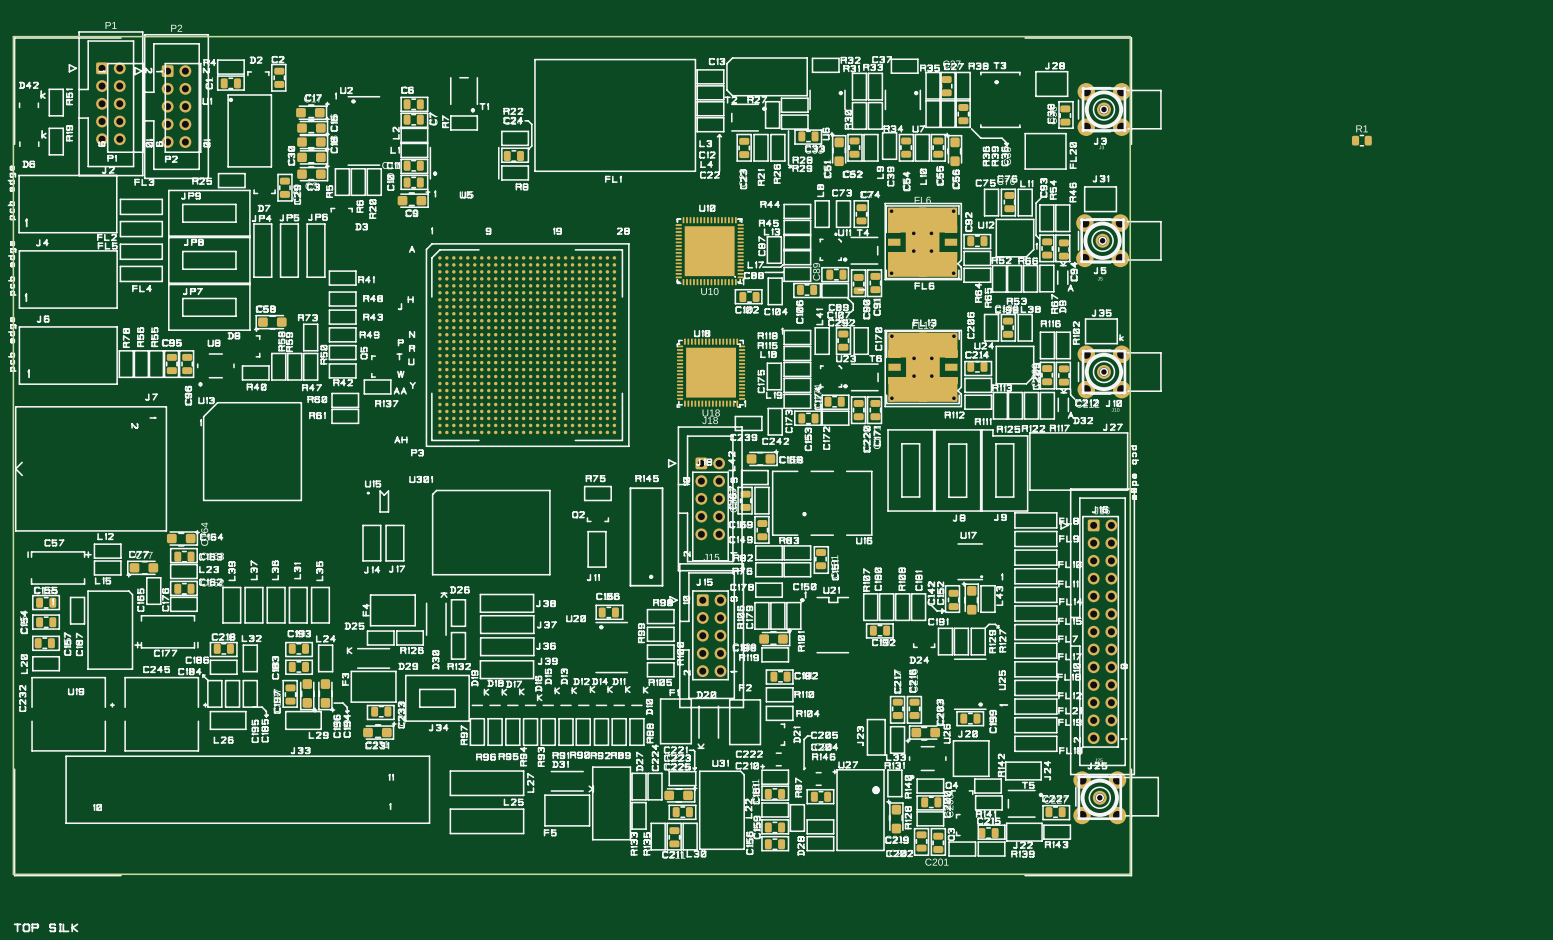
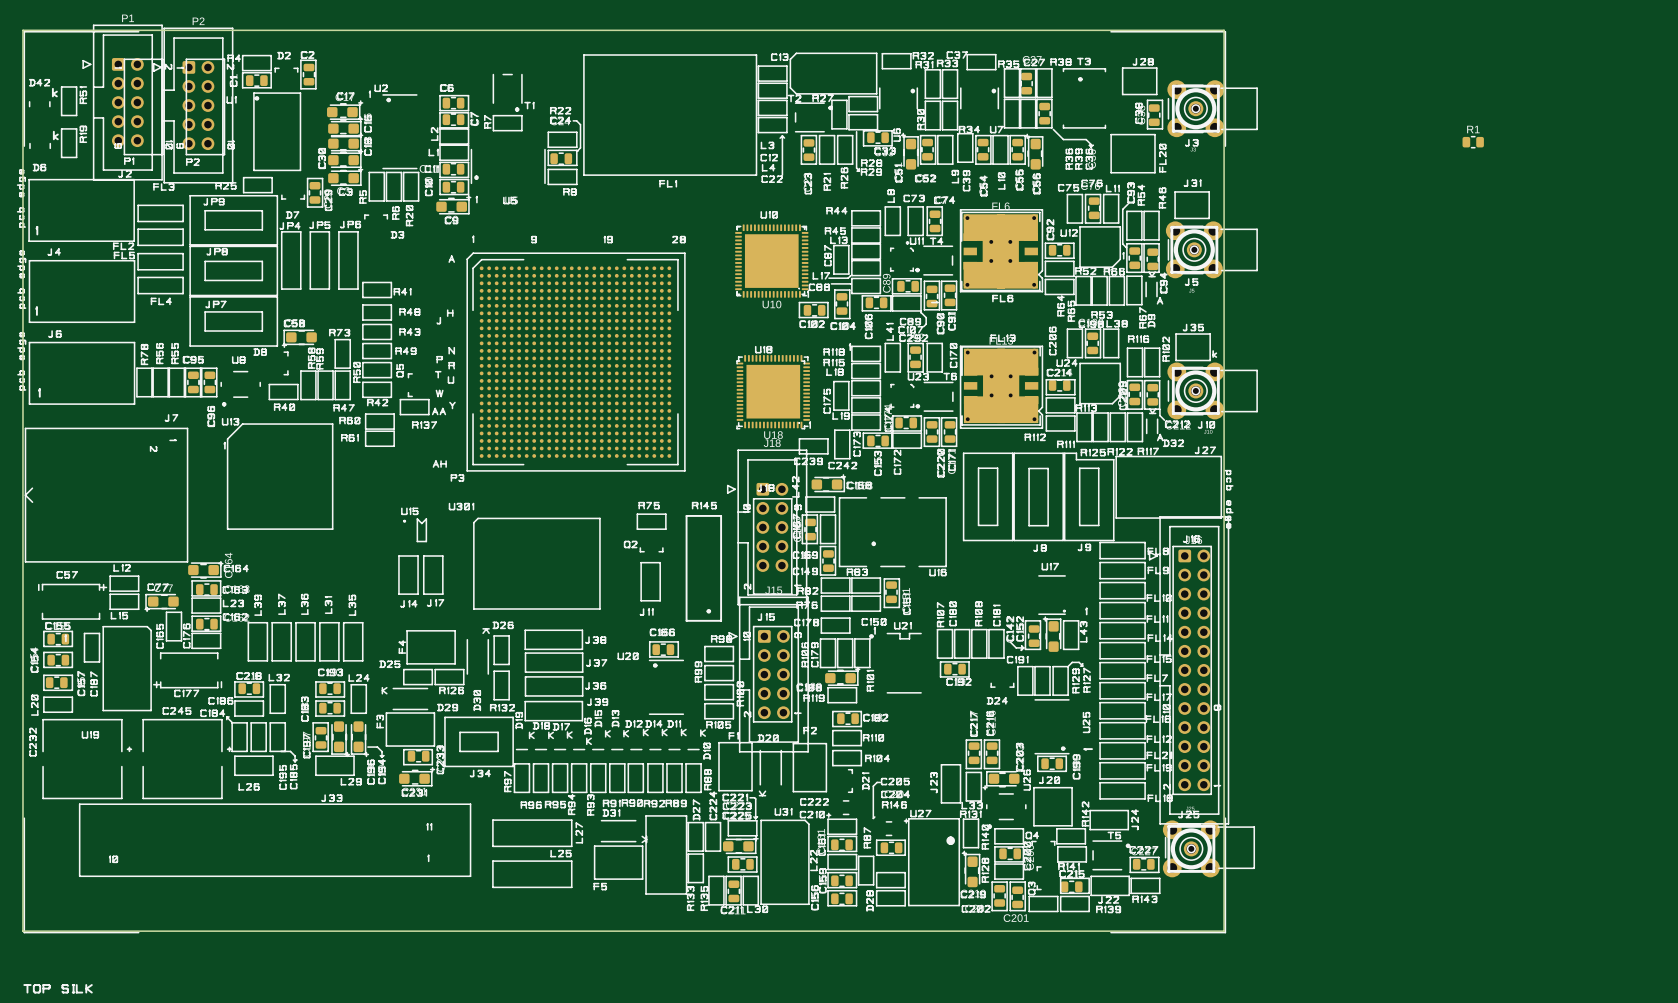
part: none -> (841, 303)

